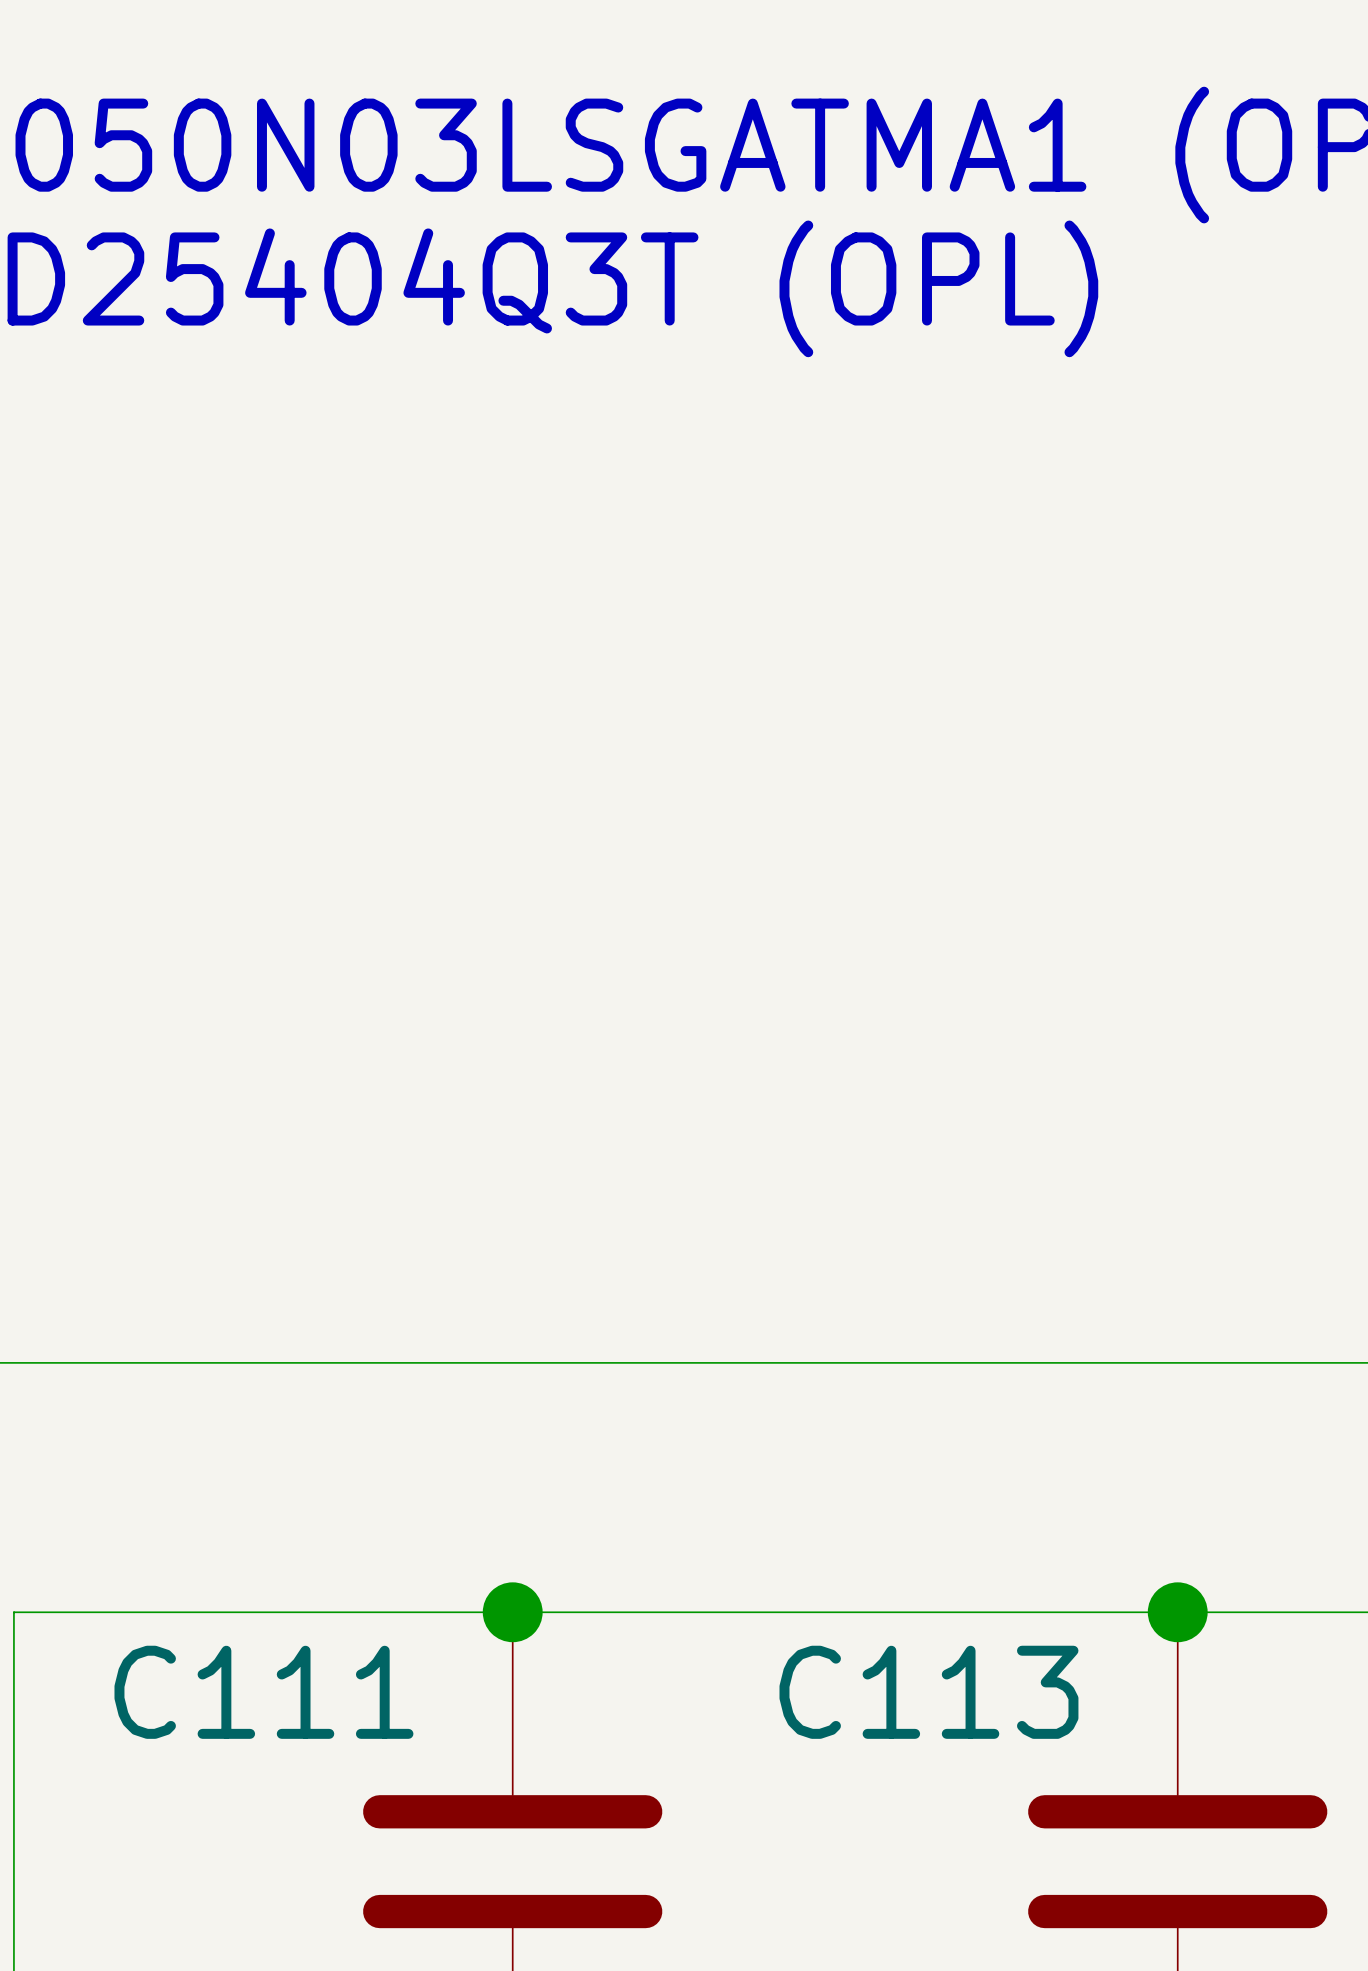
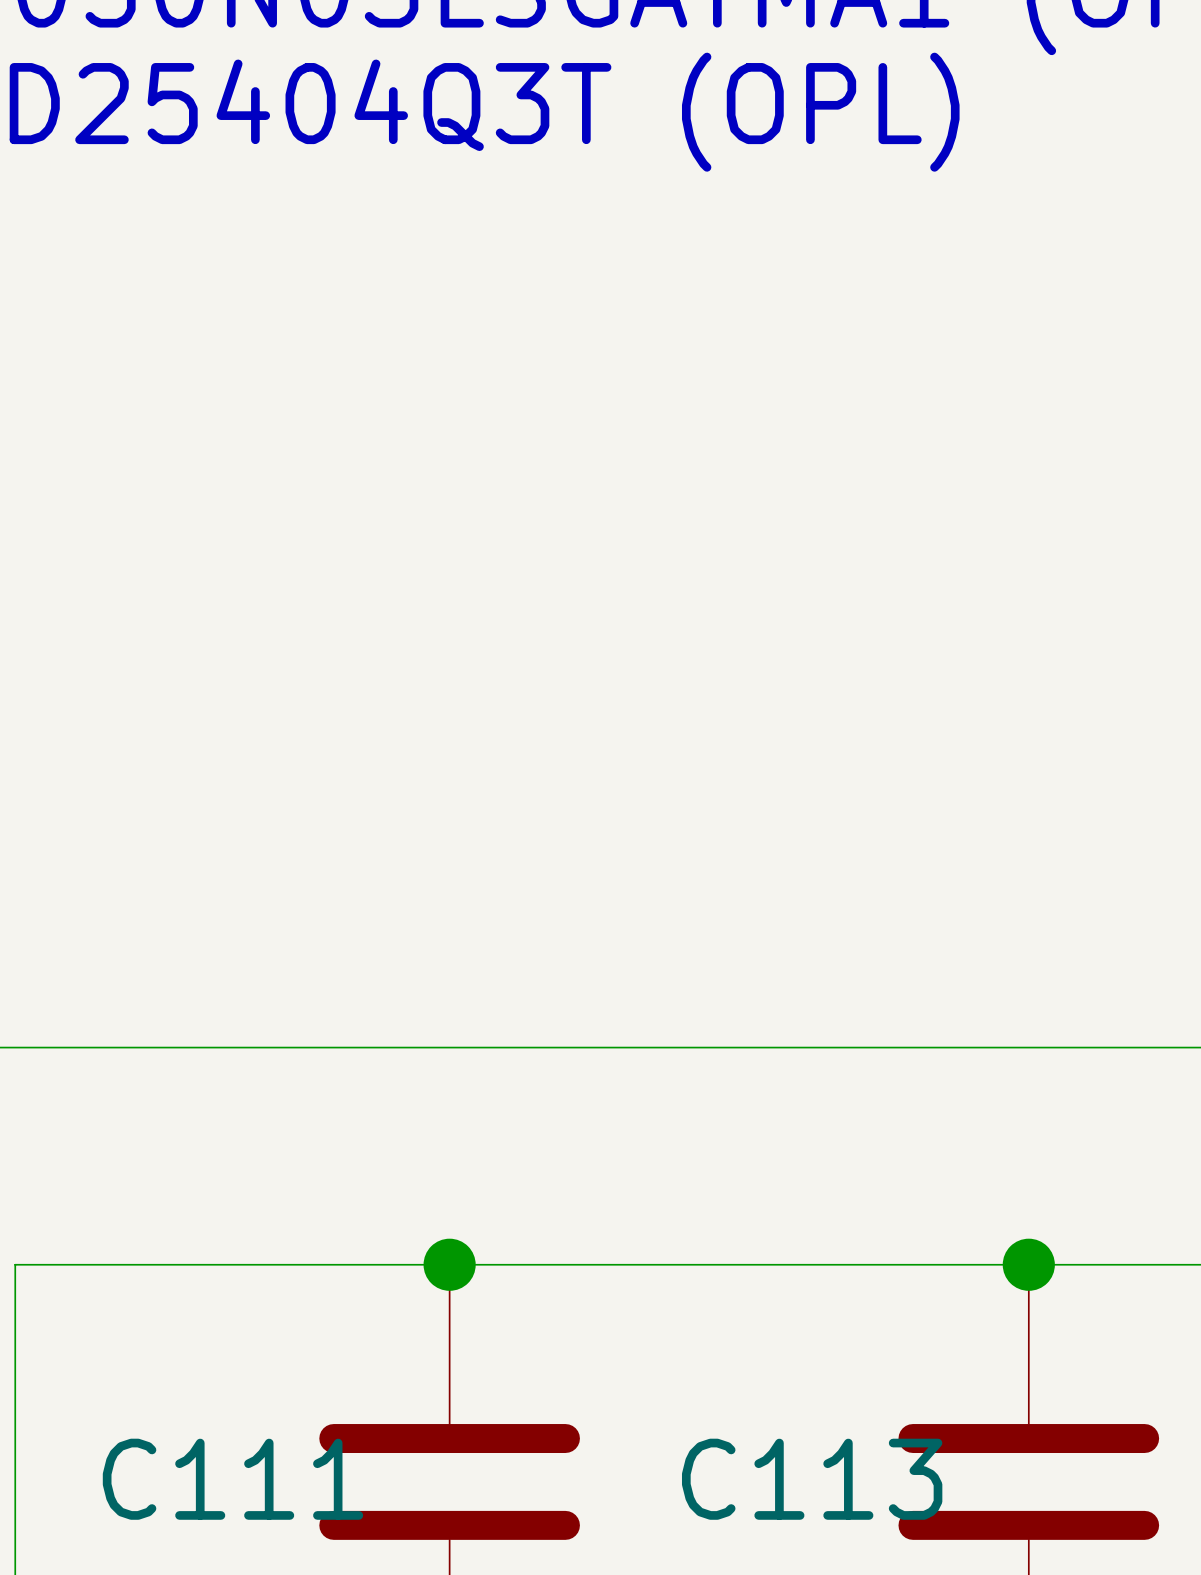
C111 name position: C111 (263, 1692) -> C111 (232, 1479)
C113 name position: C113 (928, 1692) -> C113 (812, 1479)

